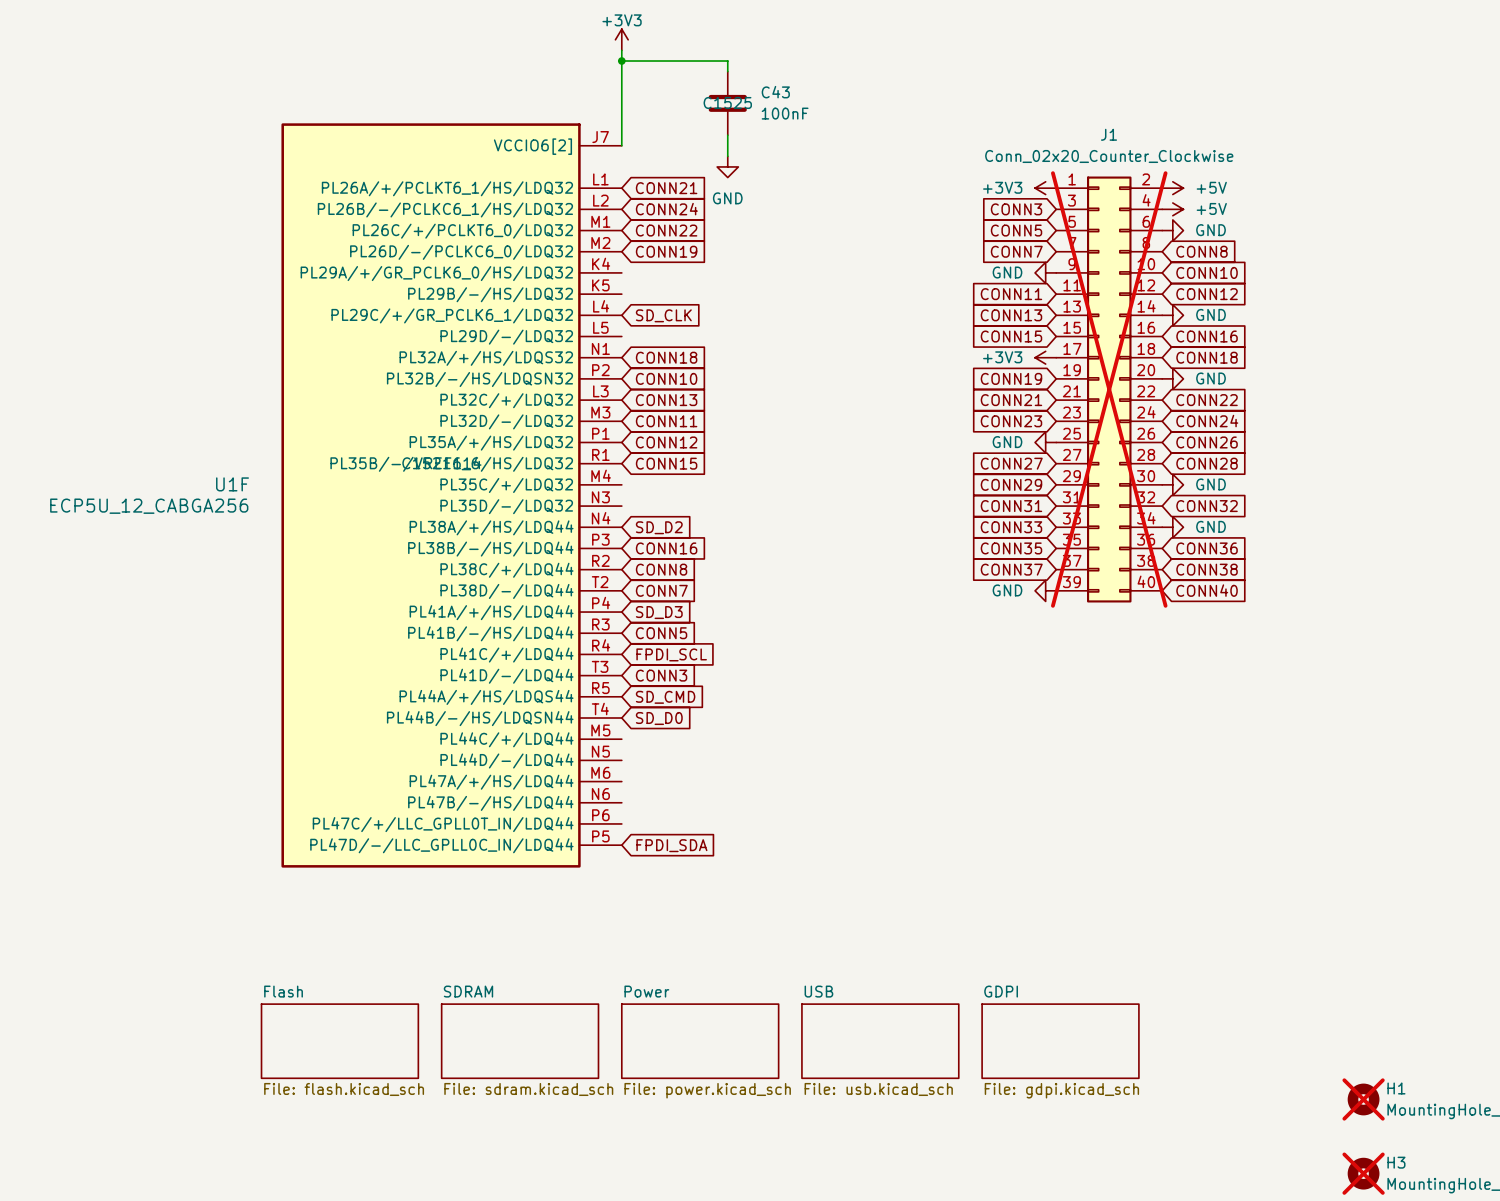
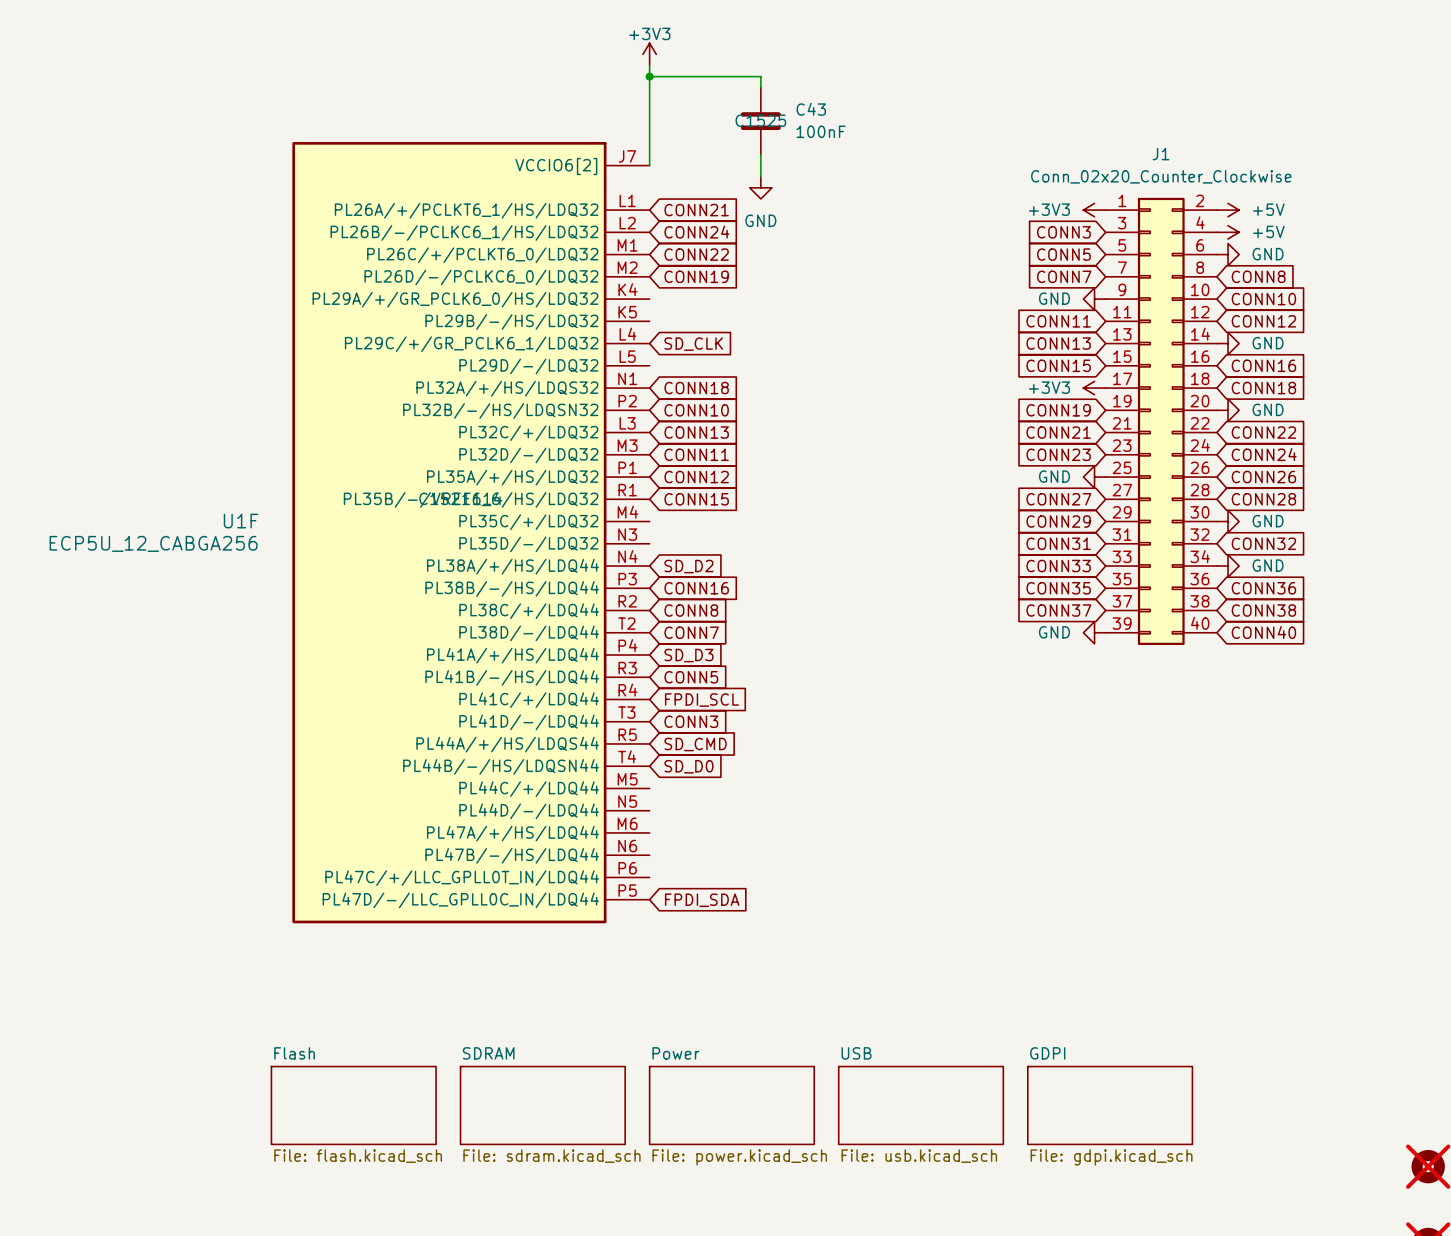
J1 do-not-place cross: (1109, 389) -> none

